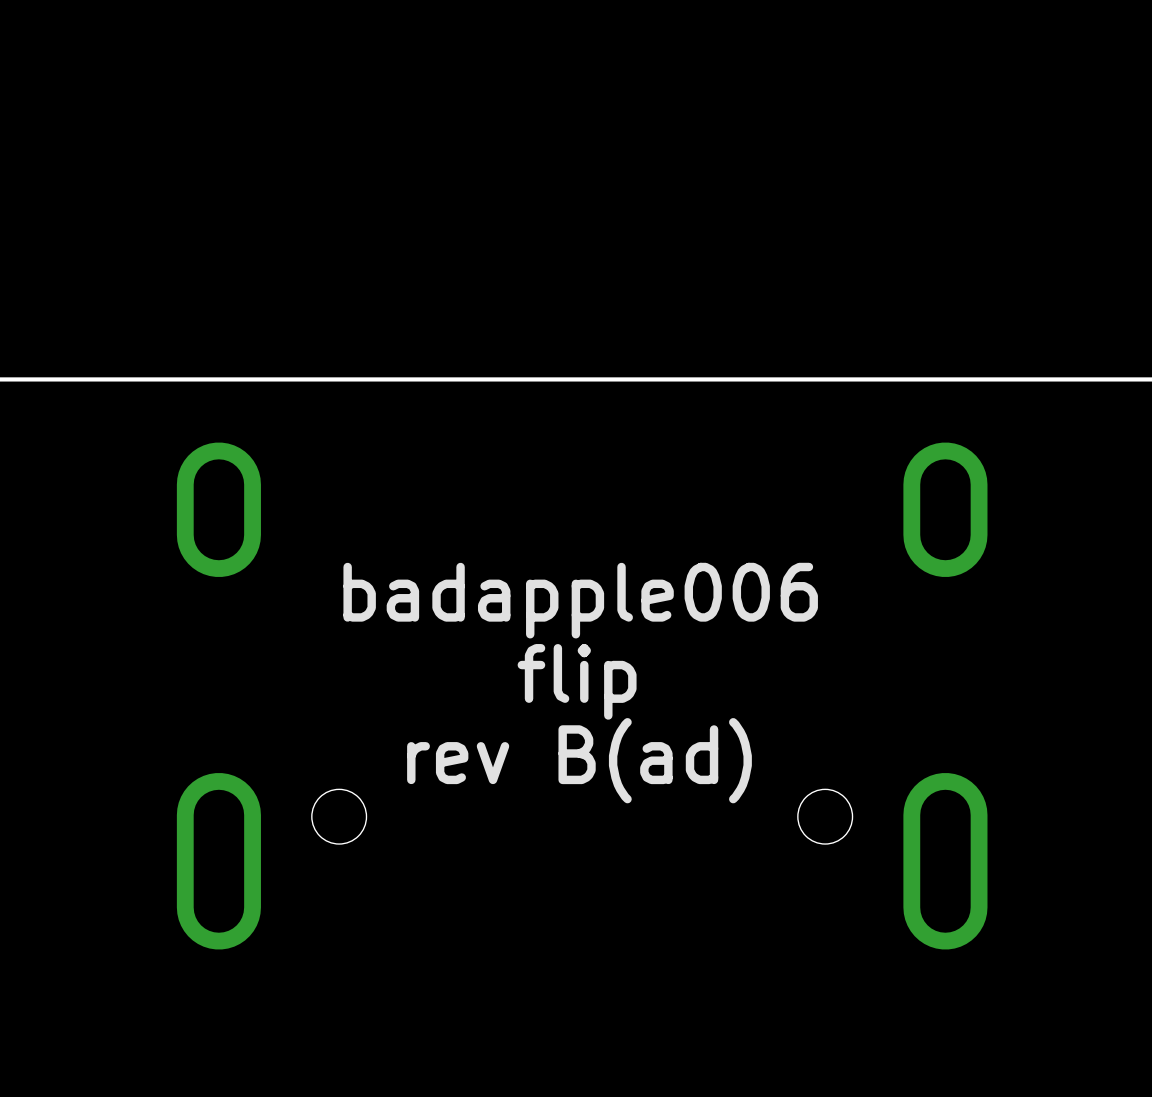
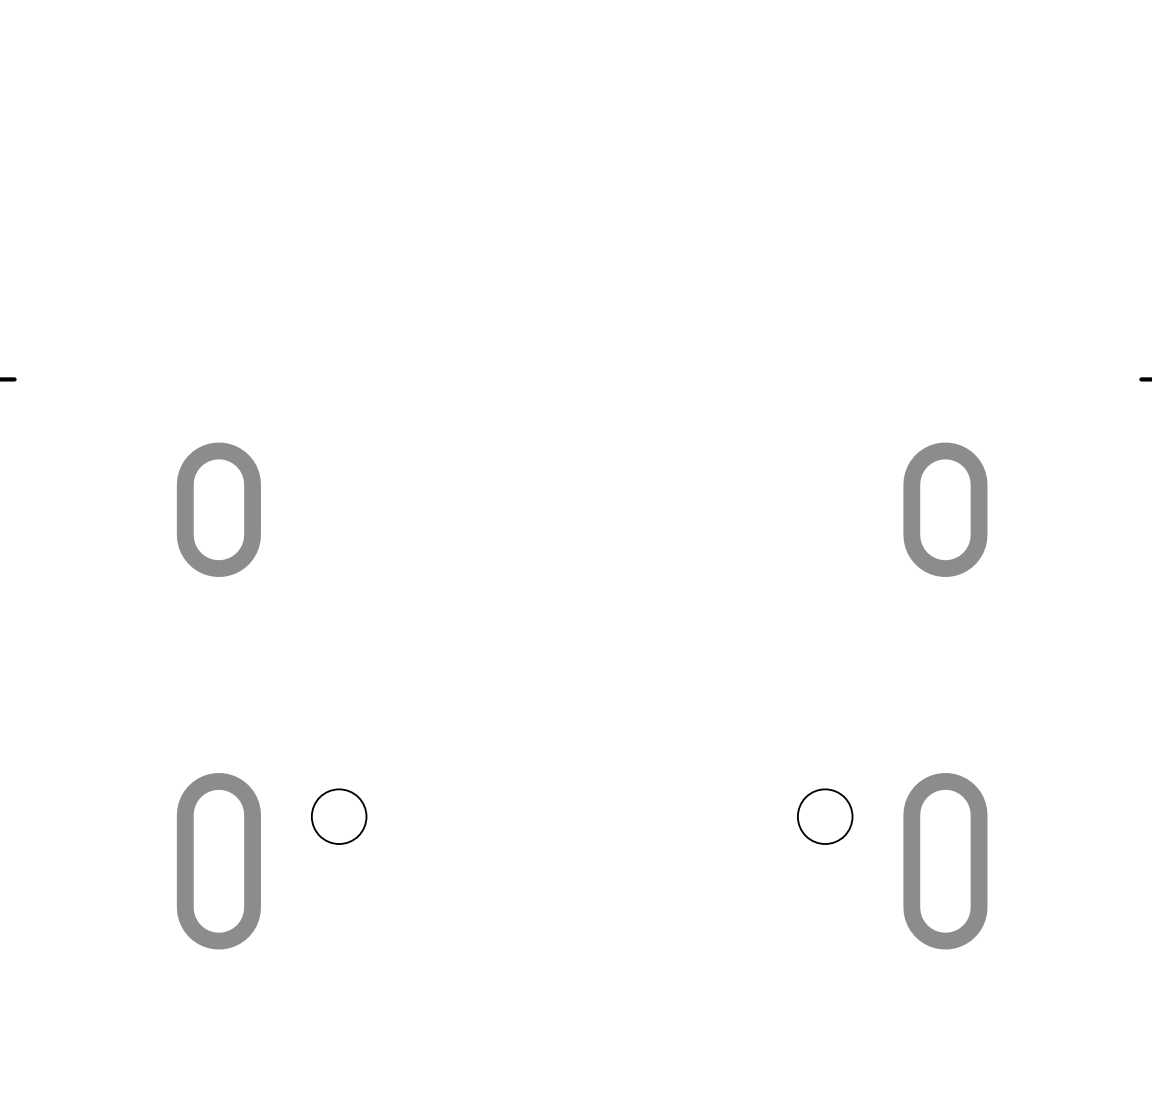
board edge: (1141, 379) (14, 379) -> none
text: badapple006 (580, 600) -> none
text: flip (577, 681) -> none
text: rev B(ad) (579, 760) -> none

